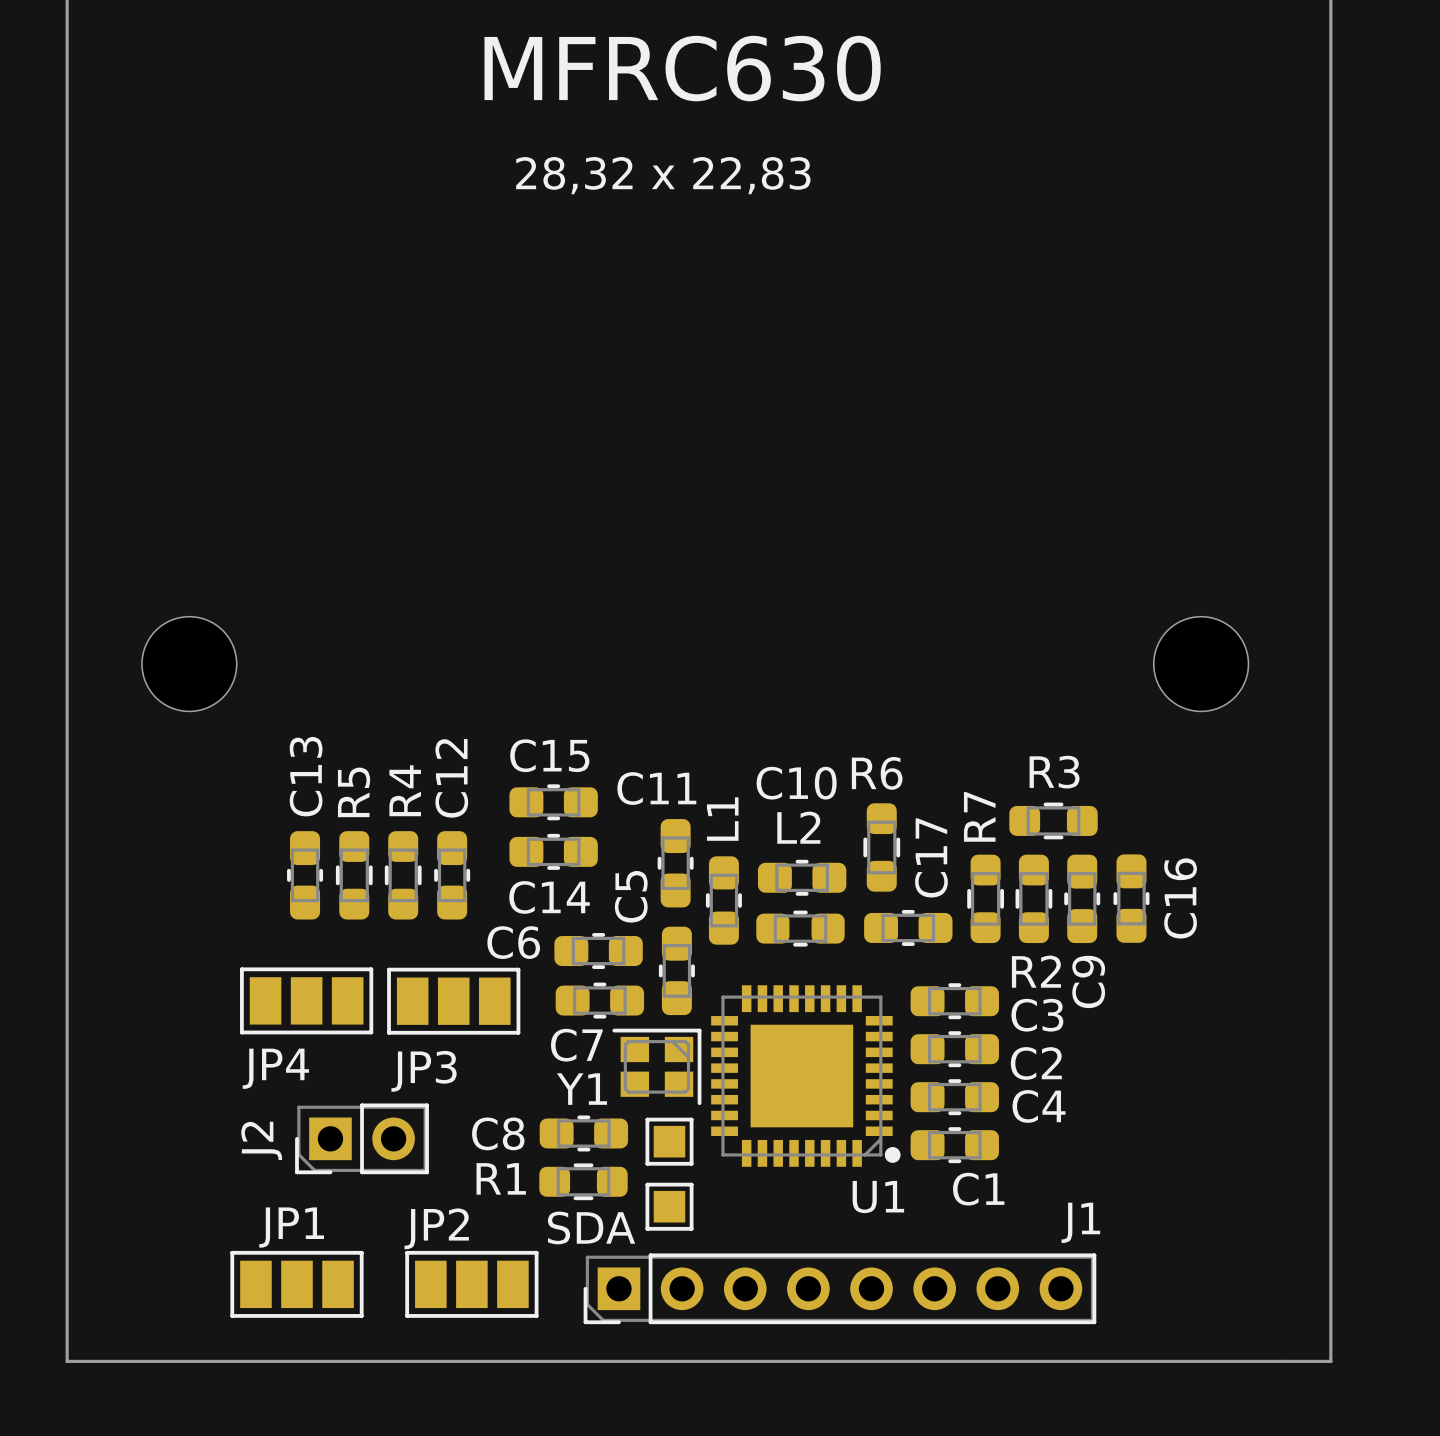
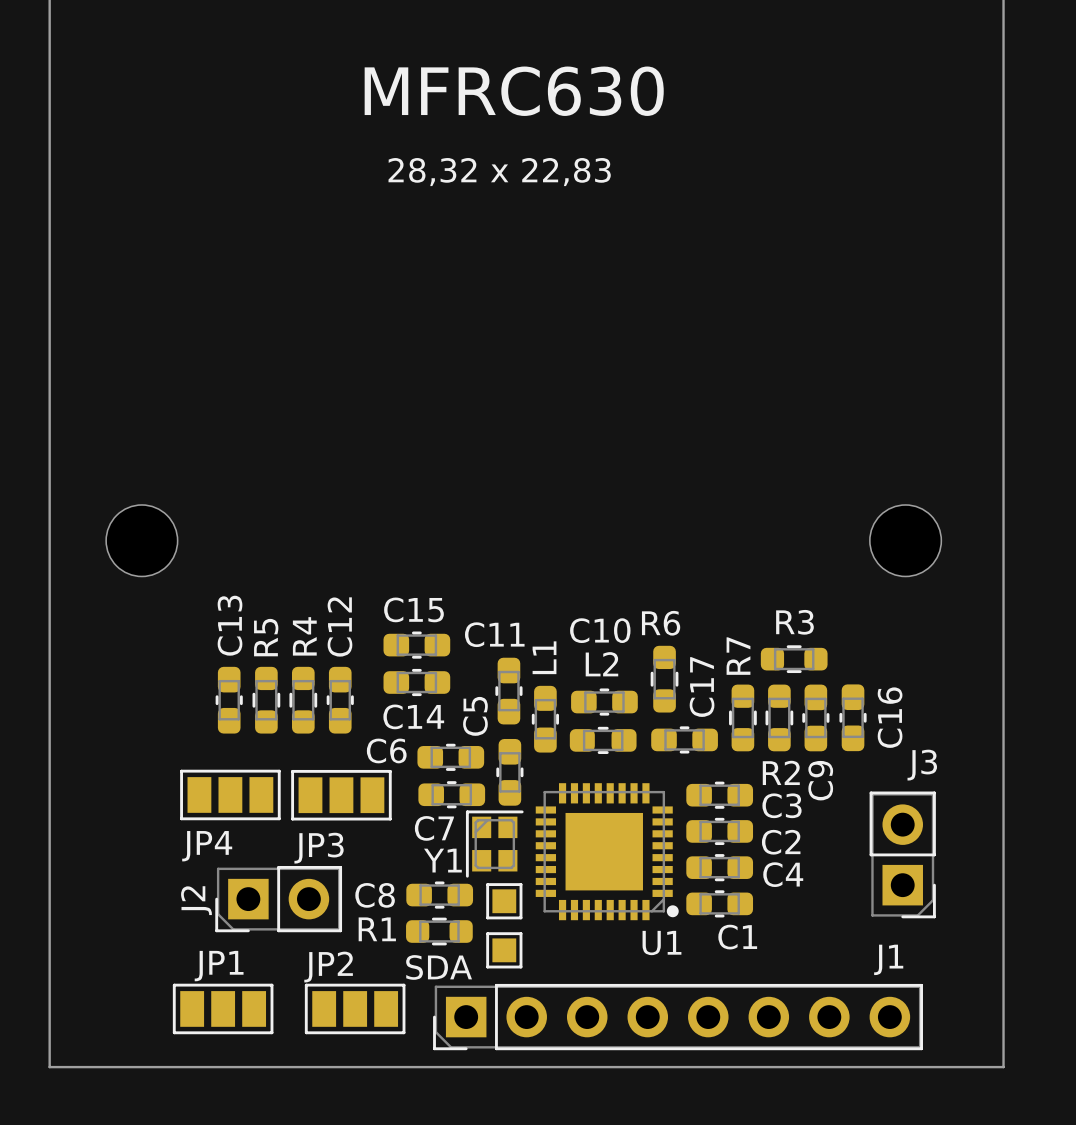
Y1 rotation: 0° (656, 1066) -> 90° counterclockwise (494, 844)
J3: none -> (902, 854)
J2 footprint: [295, 1103, 429, 1175] -> [215, 865, 343, 933]
SDA name: SDA (591, 1227) -> none
text: none -> SDA (439, 967)
J1 footprint: [583, 1253, 1097, 1325] -> [433, 983, 923, 1051]

